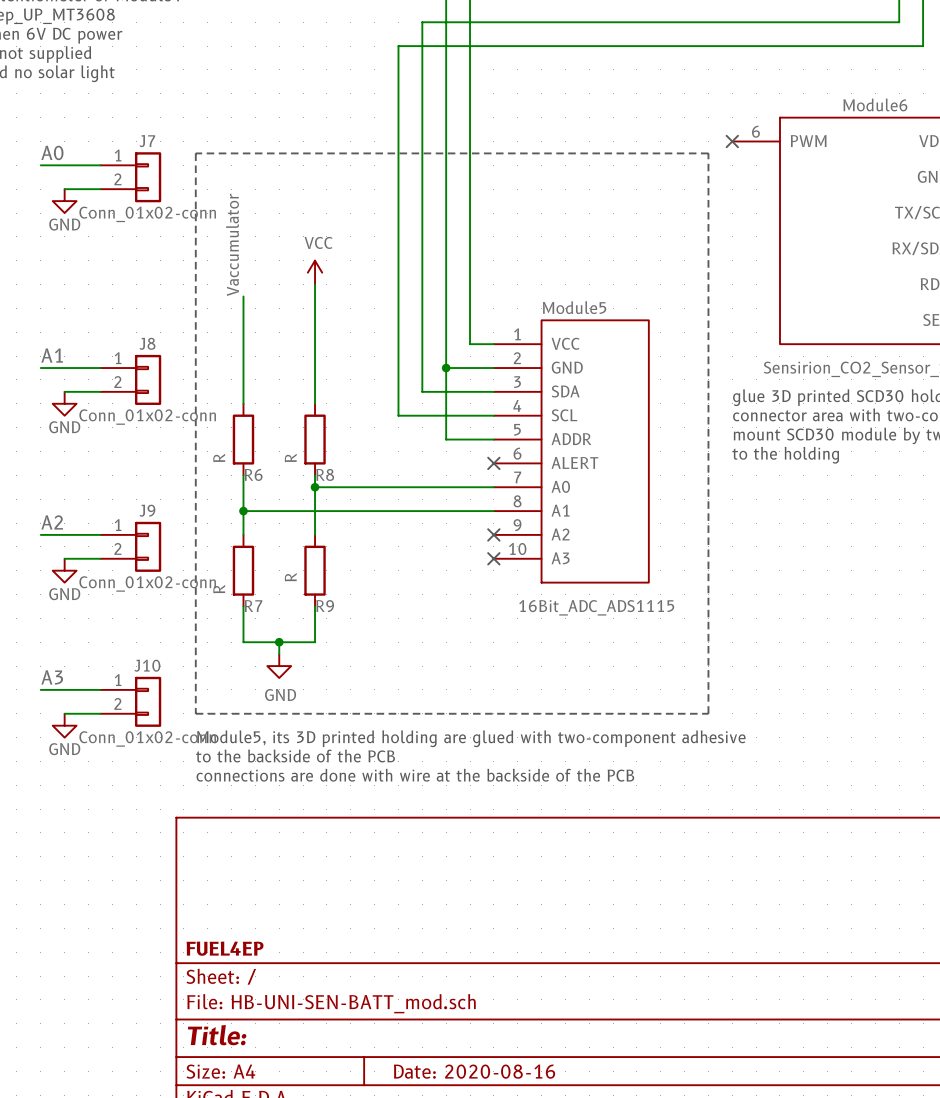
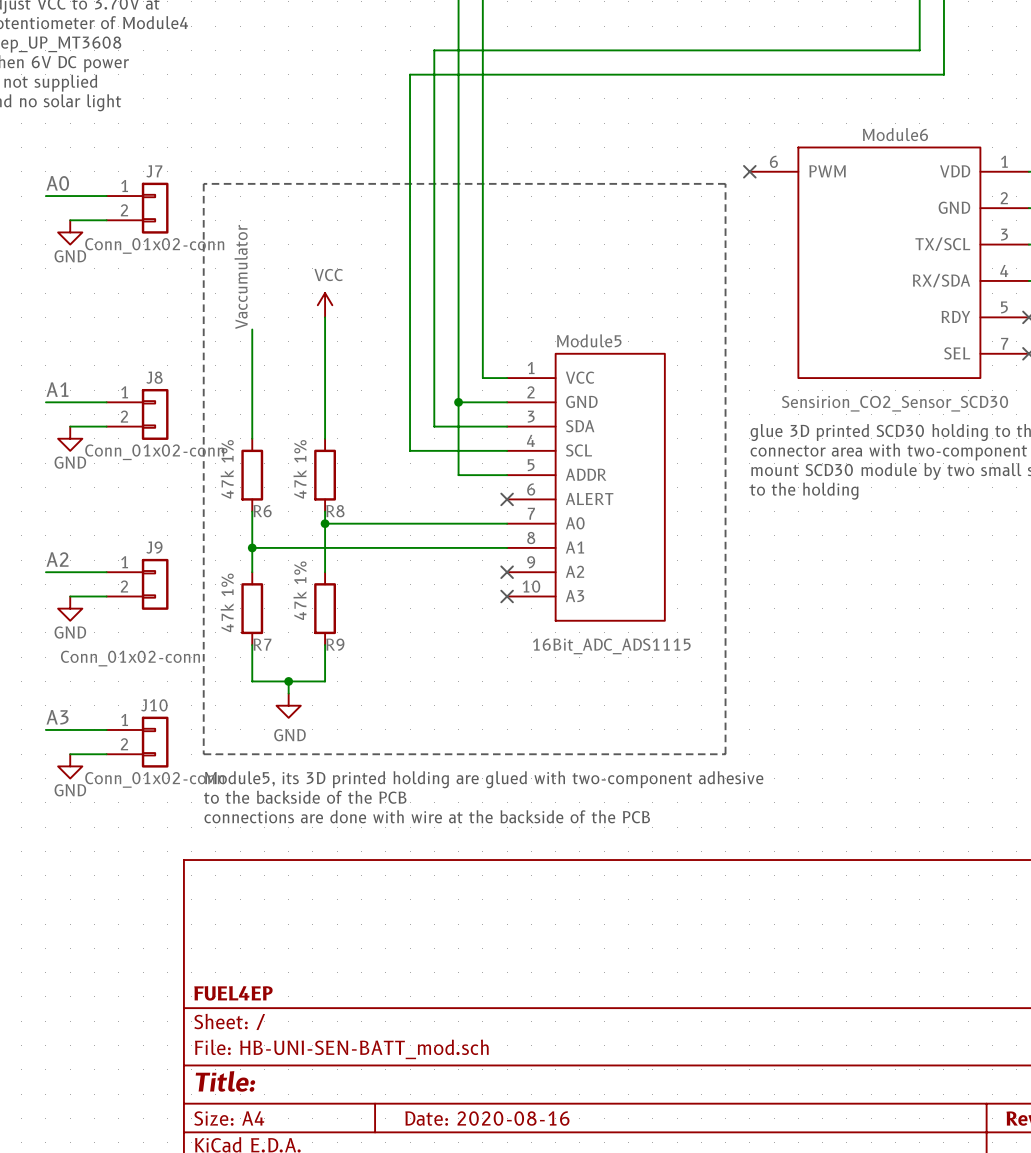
R6 value: R (219, 457) -> 47k 1% (227, 469)
R8 value: R (290, 457) -> 47k 1% (300, 469)
R9 value: R (290, 577) -> 47k 1% (300, 590)
J9 value position: Conn_01x02-conn (147, 583) -> Conn_01x02-conn (130, 658)
R7 value: R (219, 589) -> 47k 1% (227, 602)

